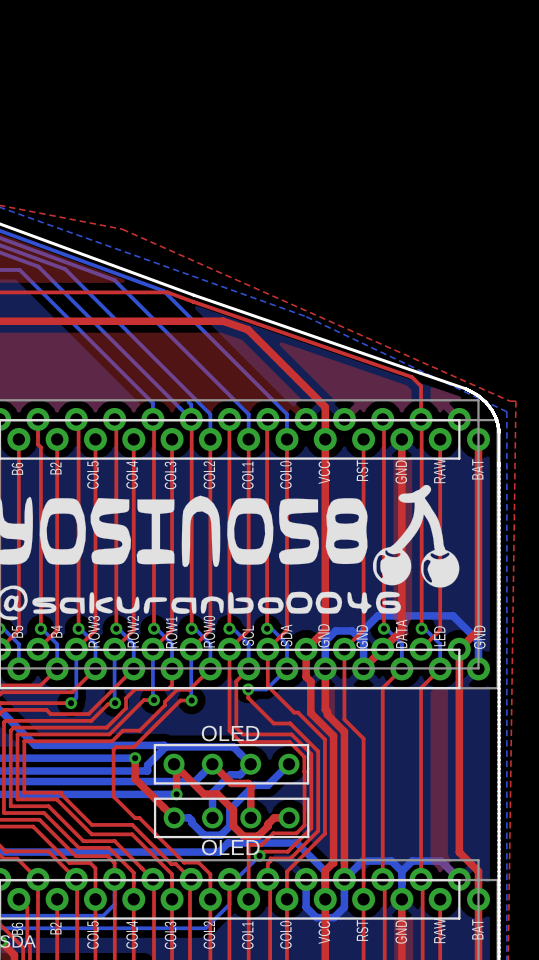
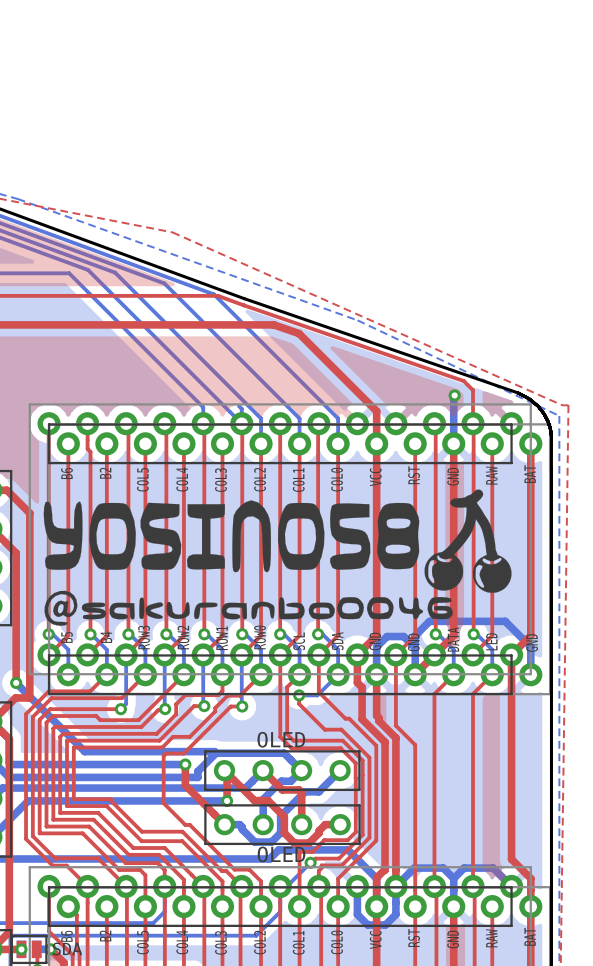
bottom track: none -> (454, 395) (453, 443)
via: none -> (454, 395)

